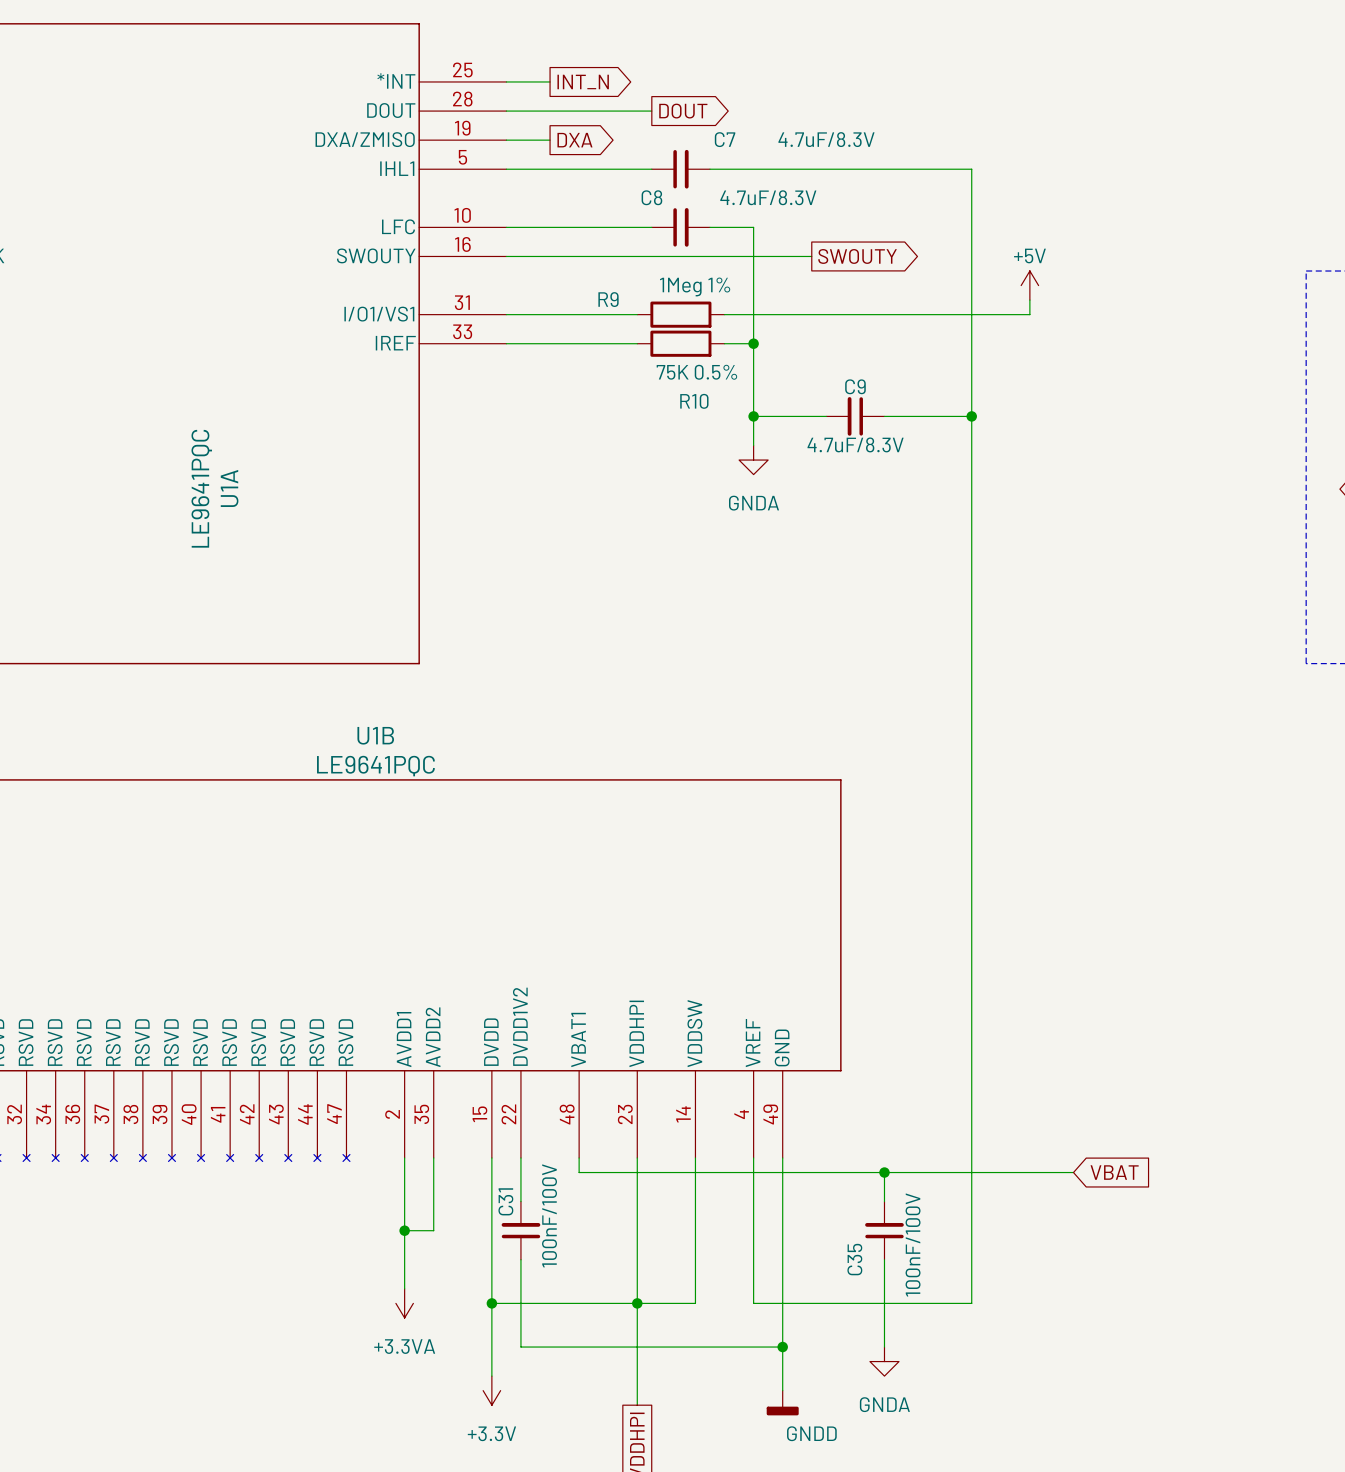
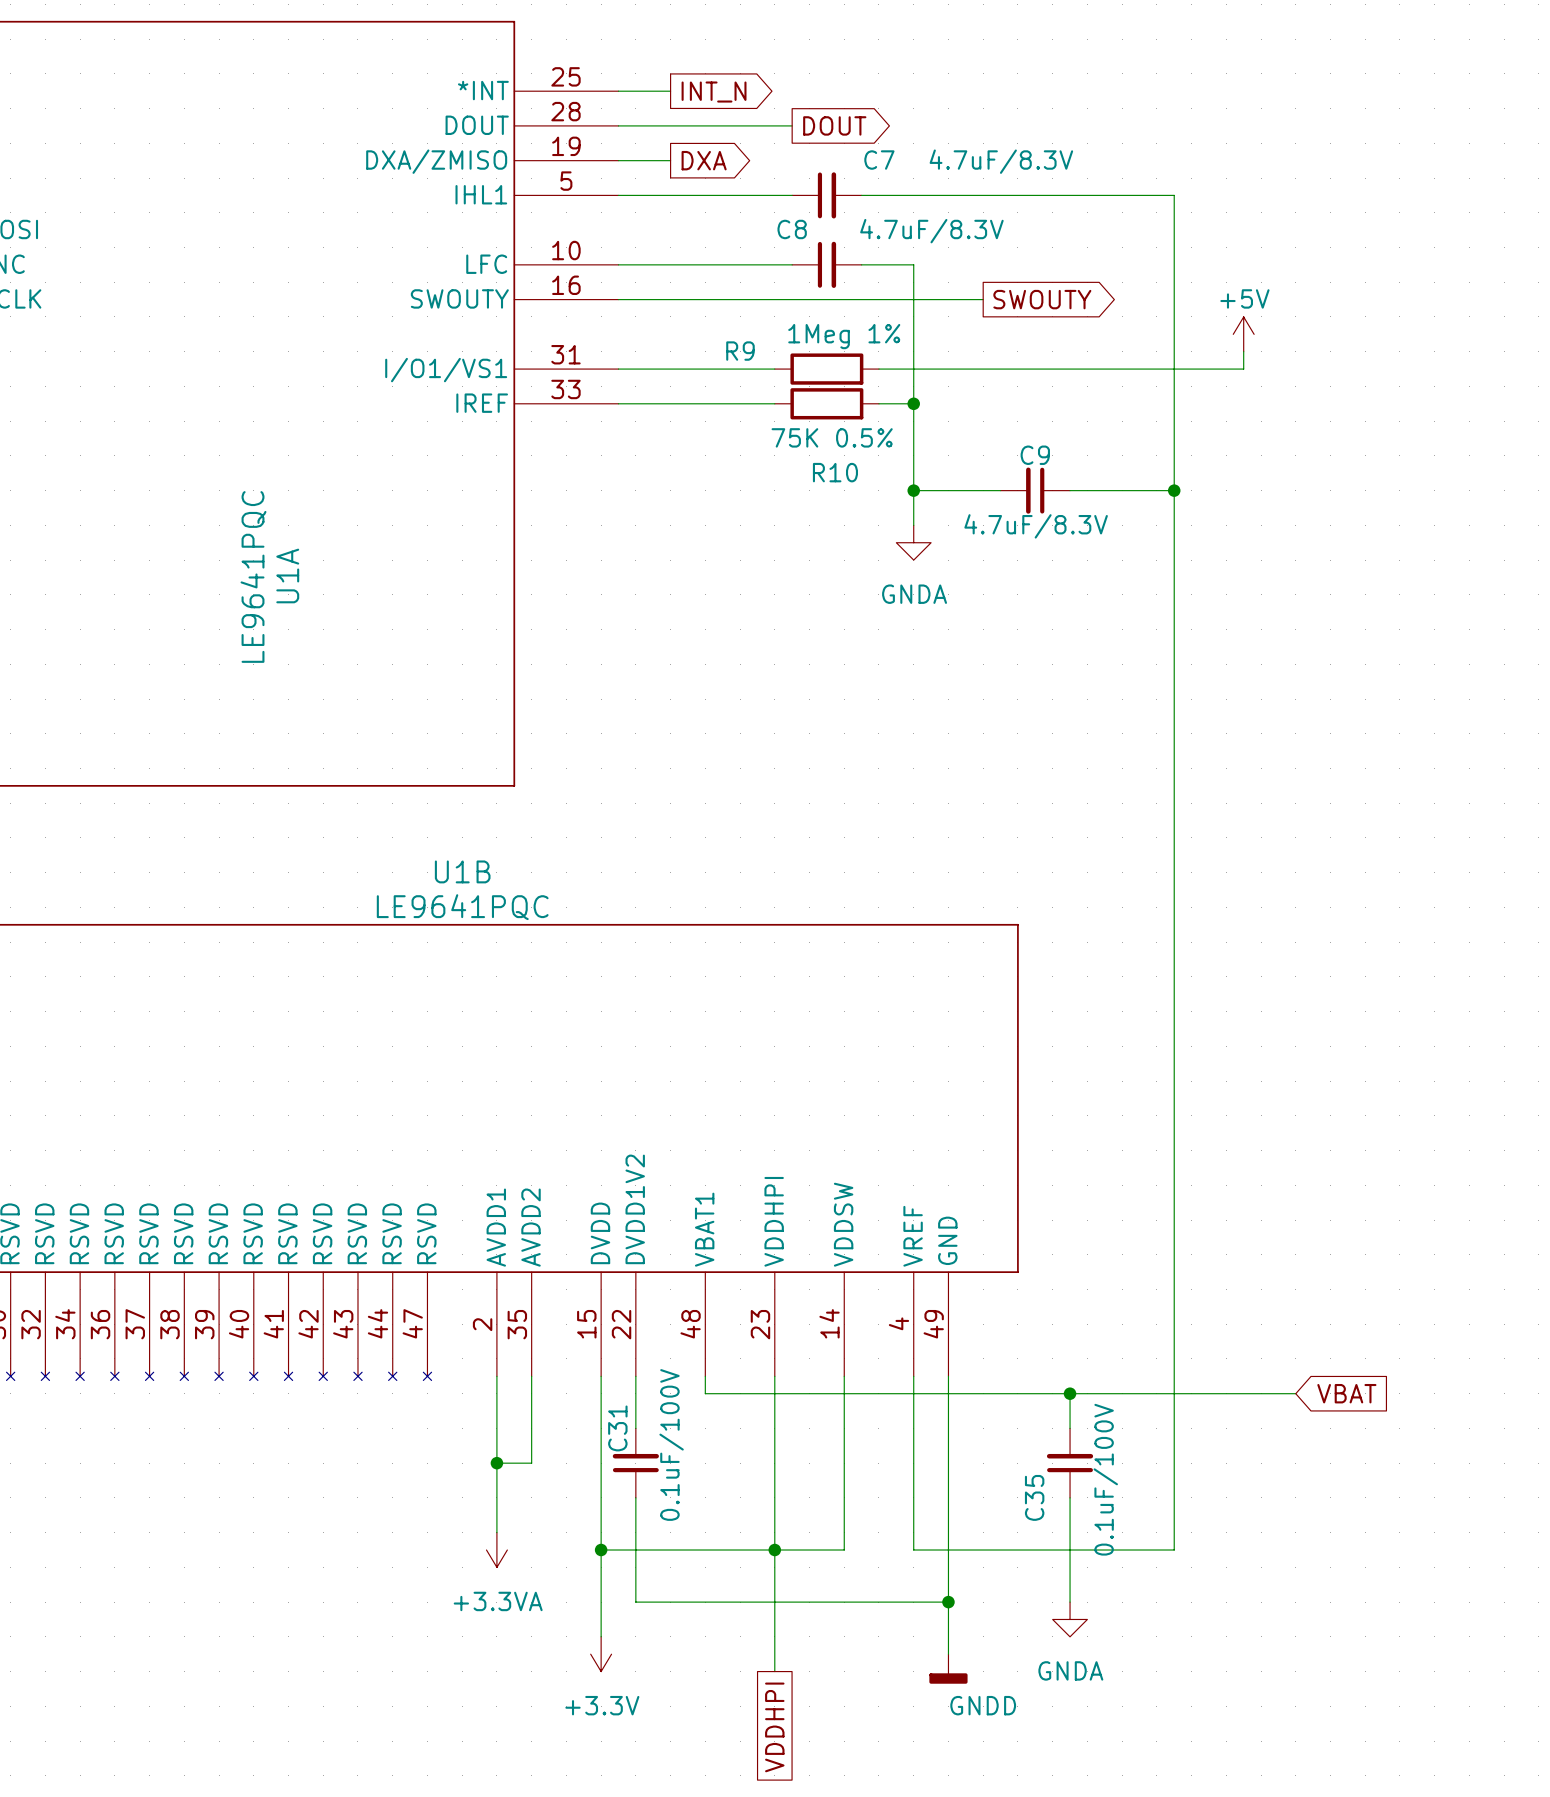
C31 value: 100nF/100V (549, 1215) -> 0.1uF/100V (671, 1444)
C35 value: 100nF/100V (913, 1244) -> 0.1uF/100V (1105, 1479)

